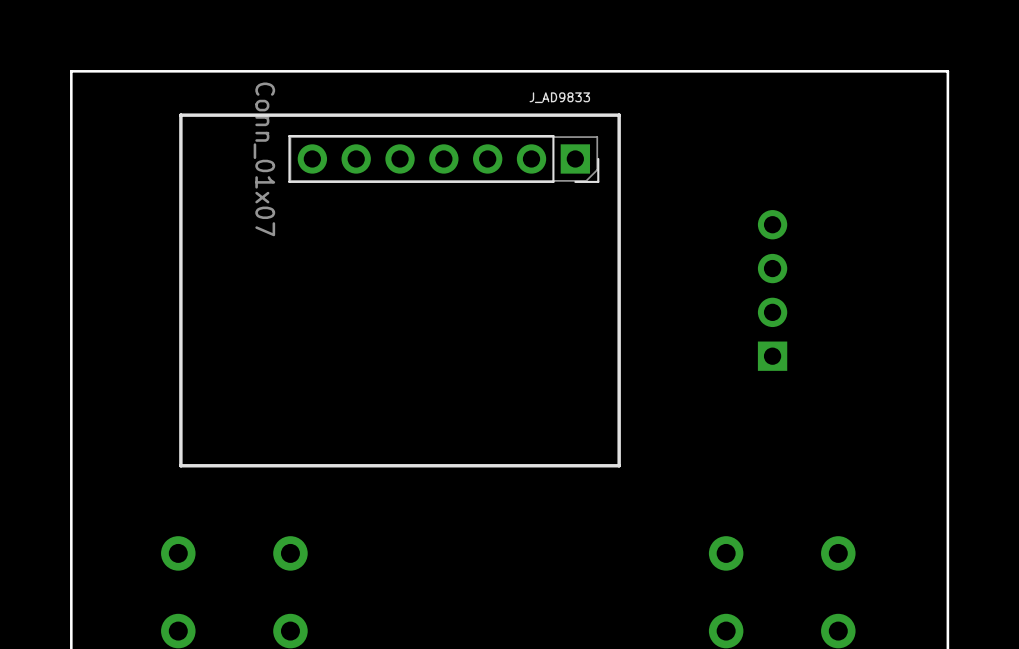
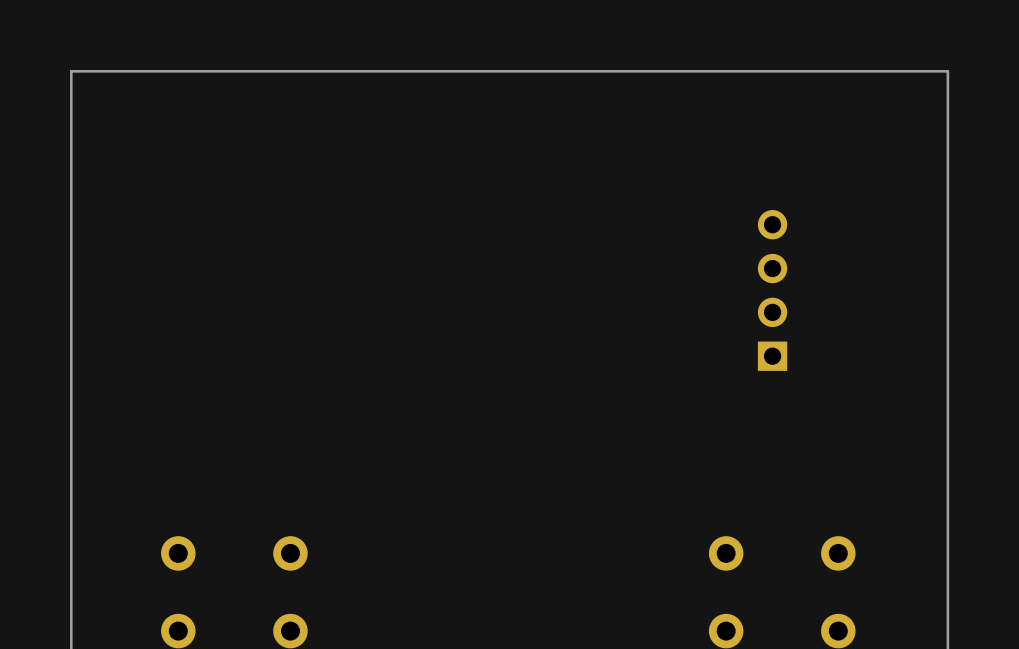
line: (619, 115) (180, 115) (180, 465) (619, 465) (619, 115) -> none
J_AD9833: Conn_01x07 (443, 158) -> none

